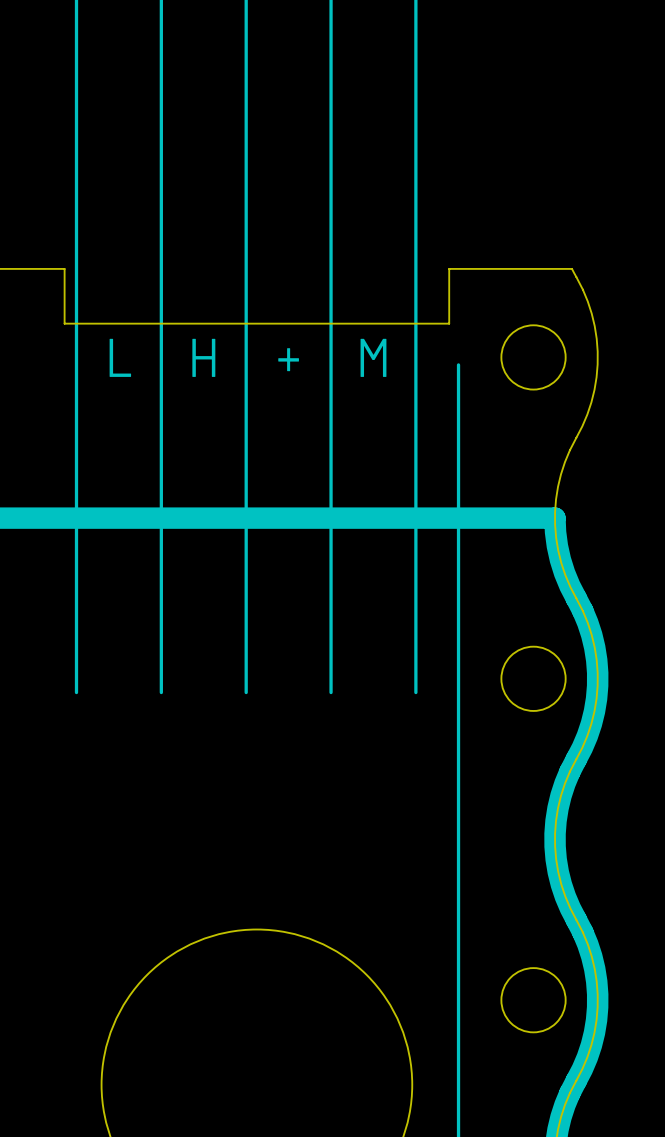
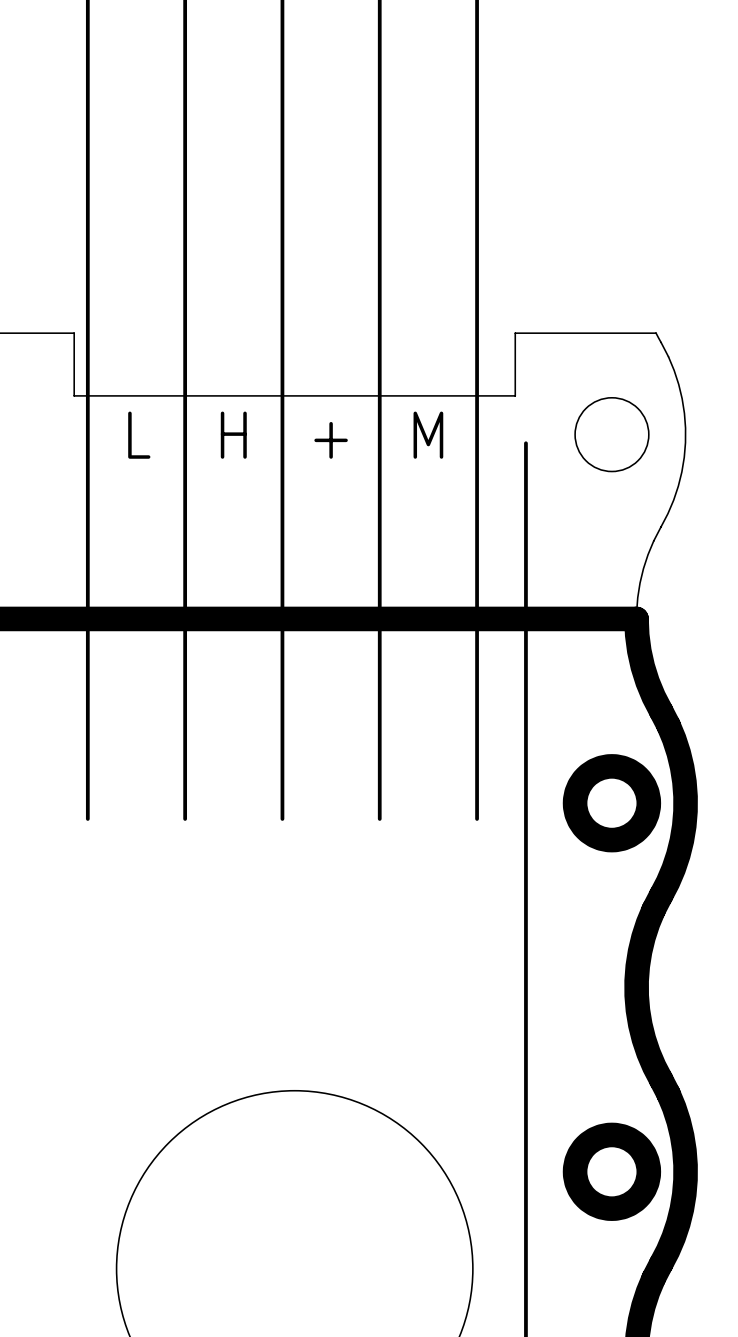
drawing: none -> [562, 754, 662, 853]
drawing: none -> [562, 1122, 662, 1221]

